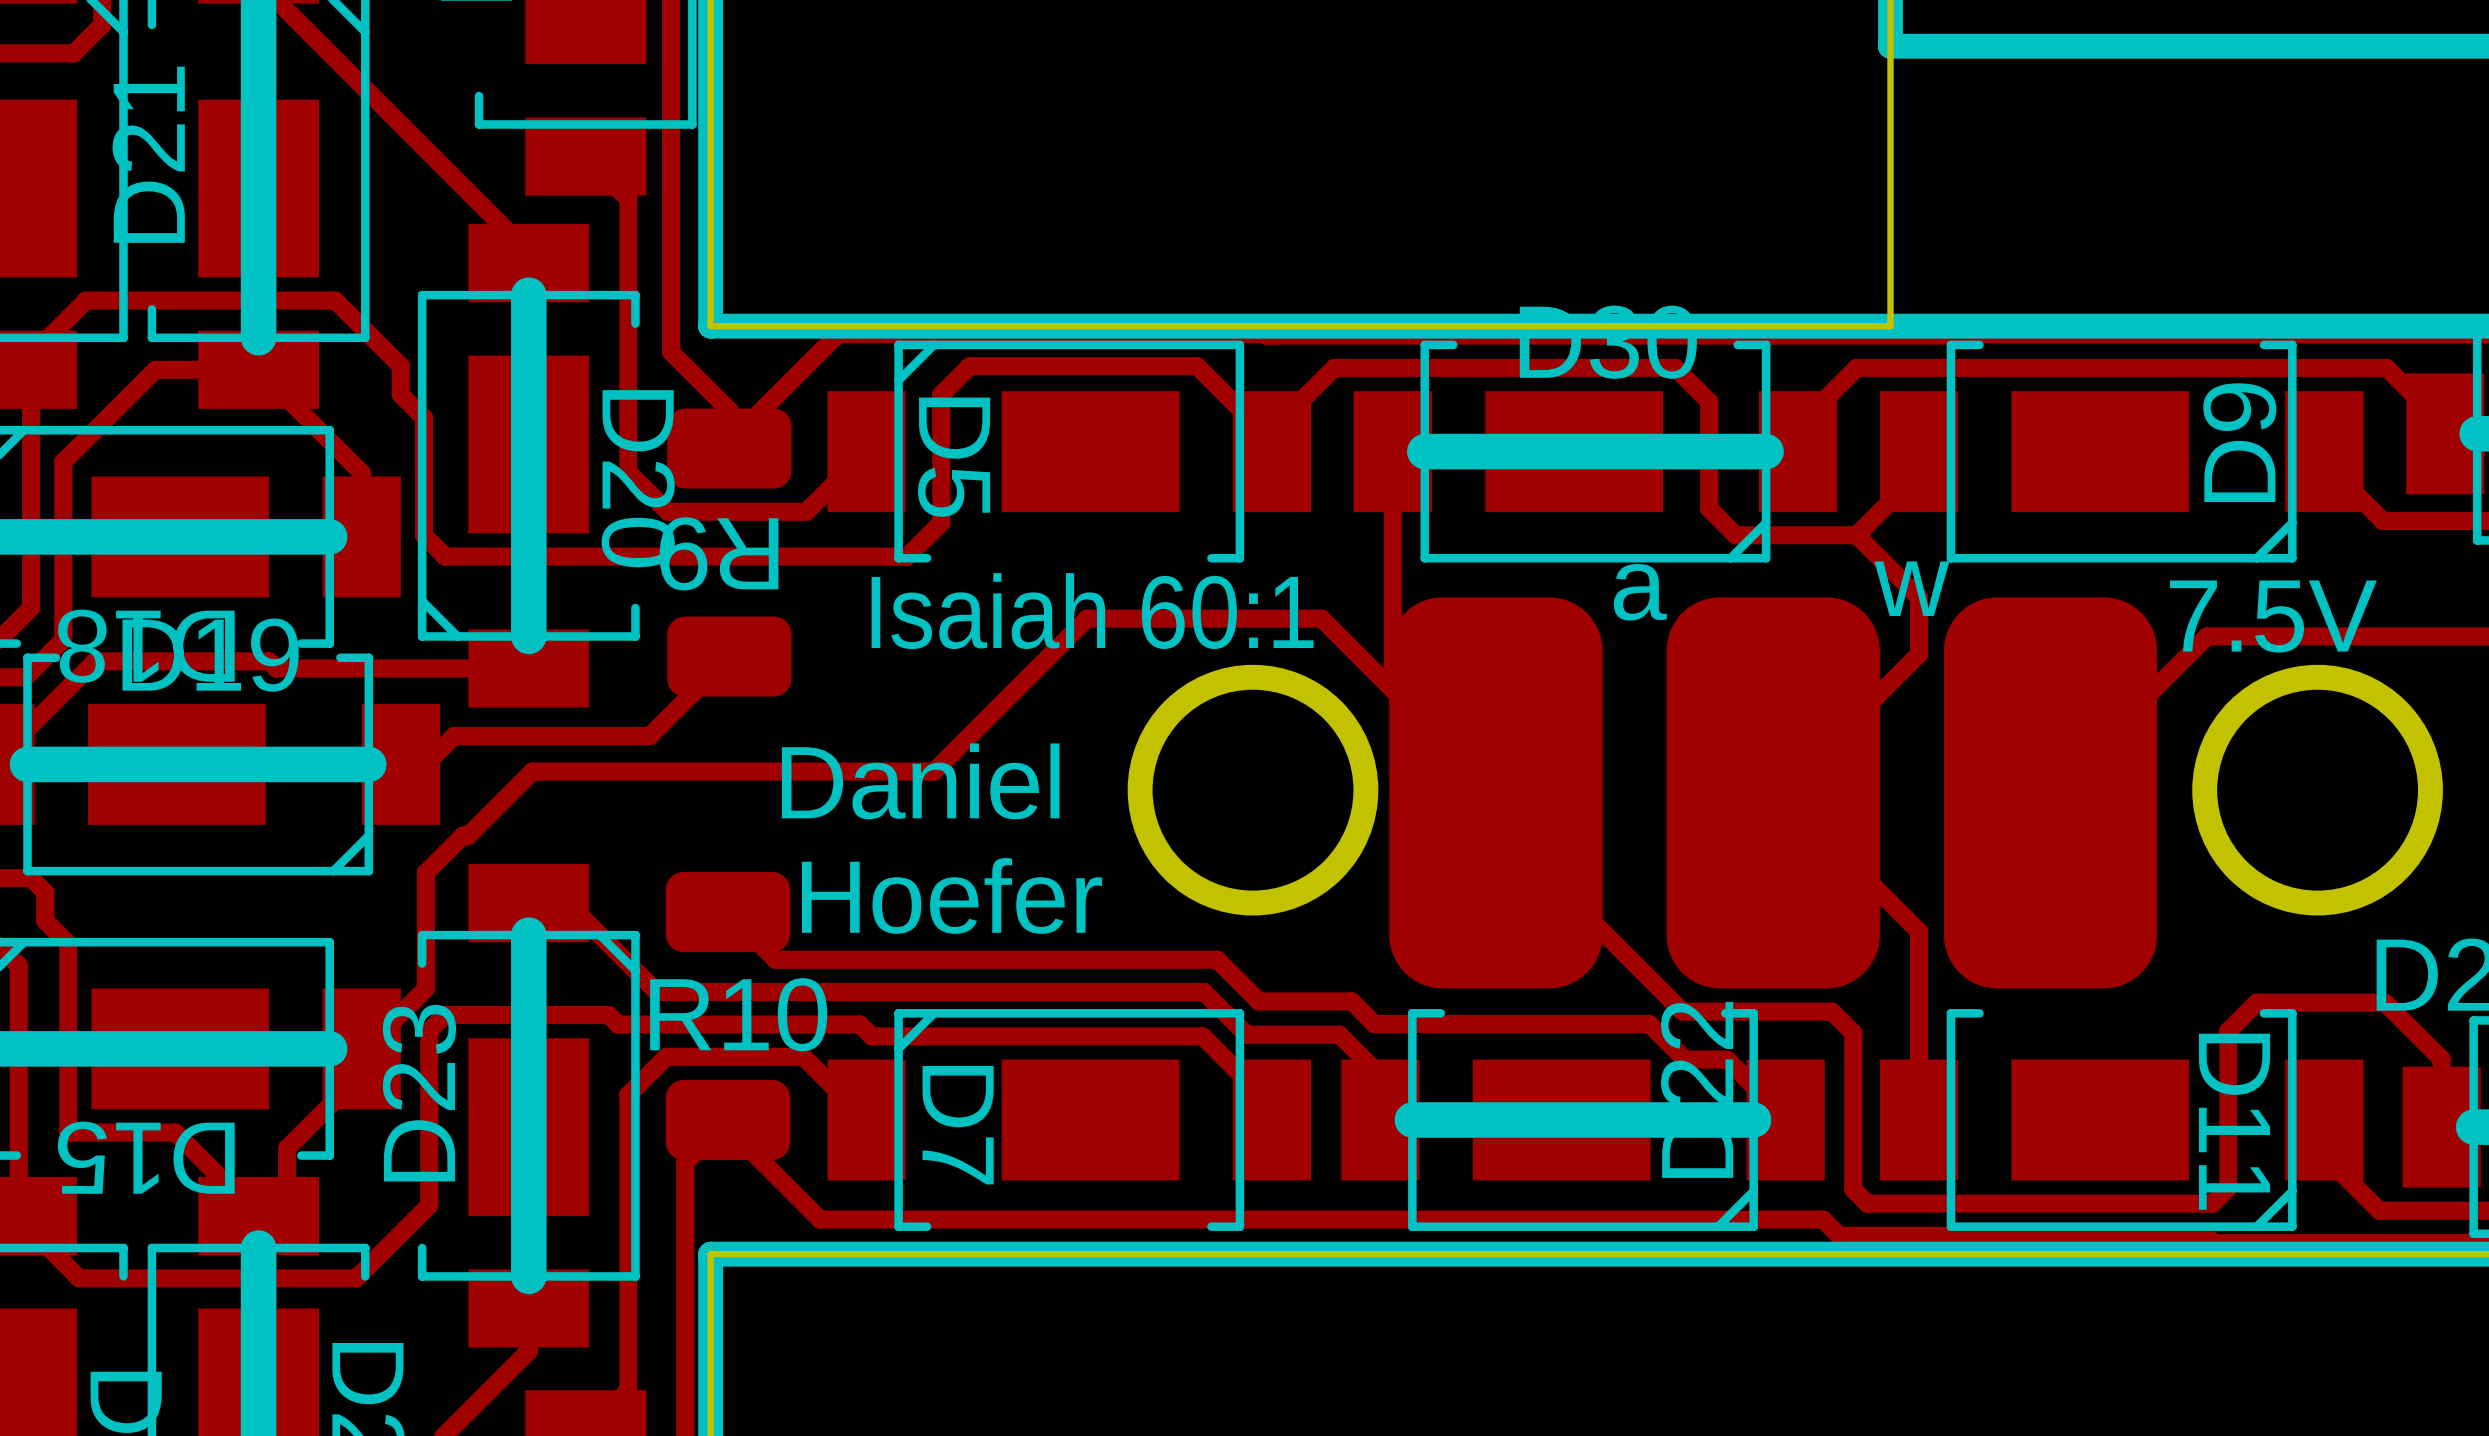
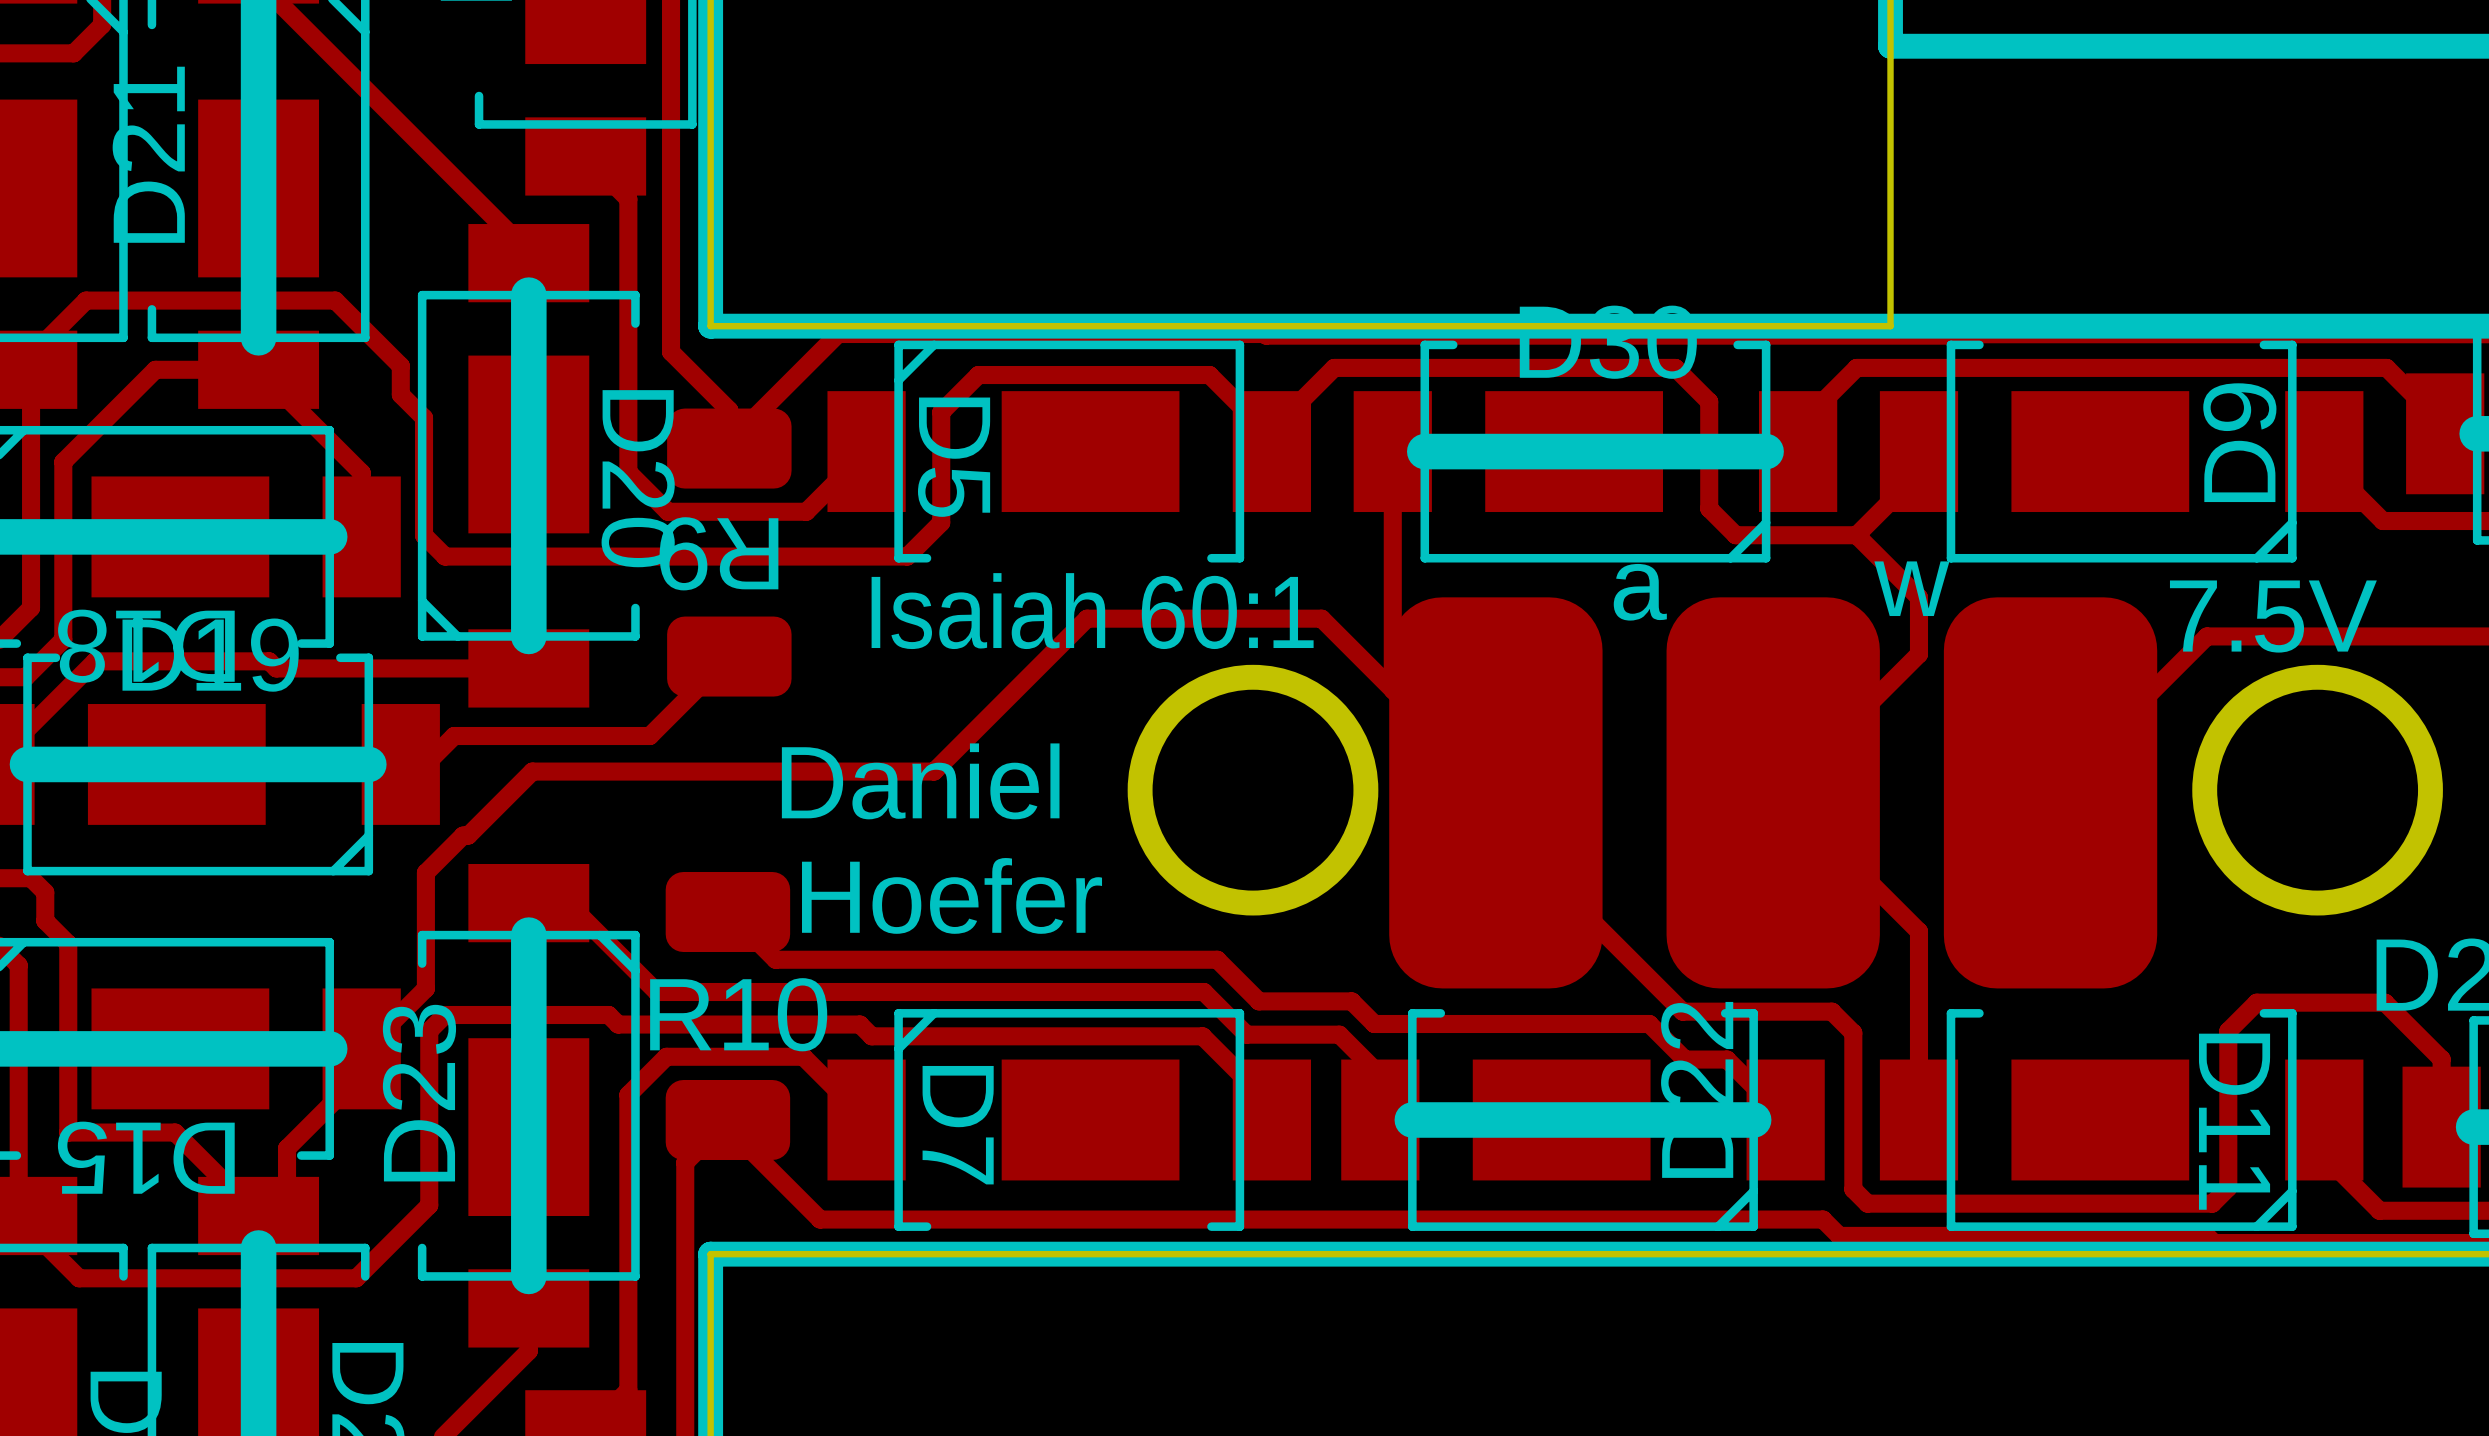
top track: (941, 412) (941, 394) (969, 366) (1197, 366) (1271, 440) -> (941, 412) (978, 375) (1209, 375) (1271, 437)

